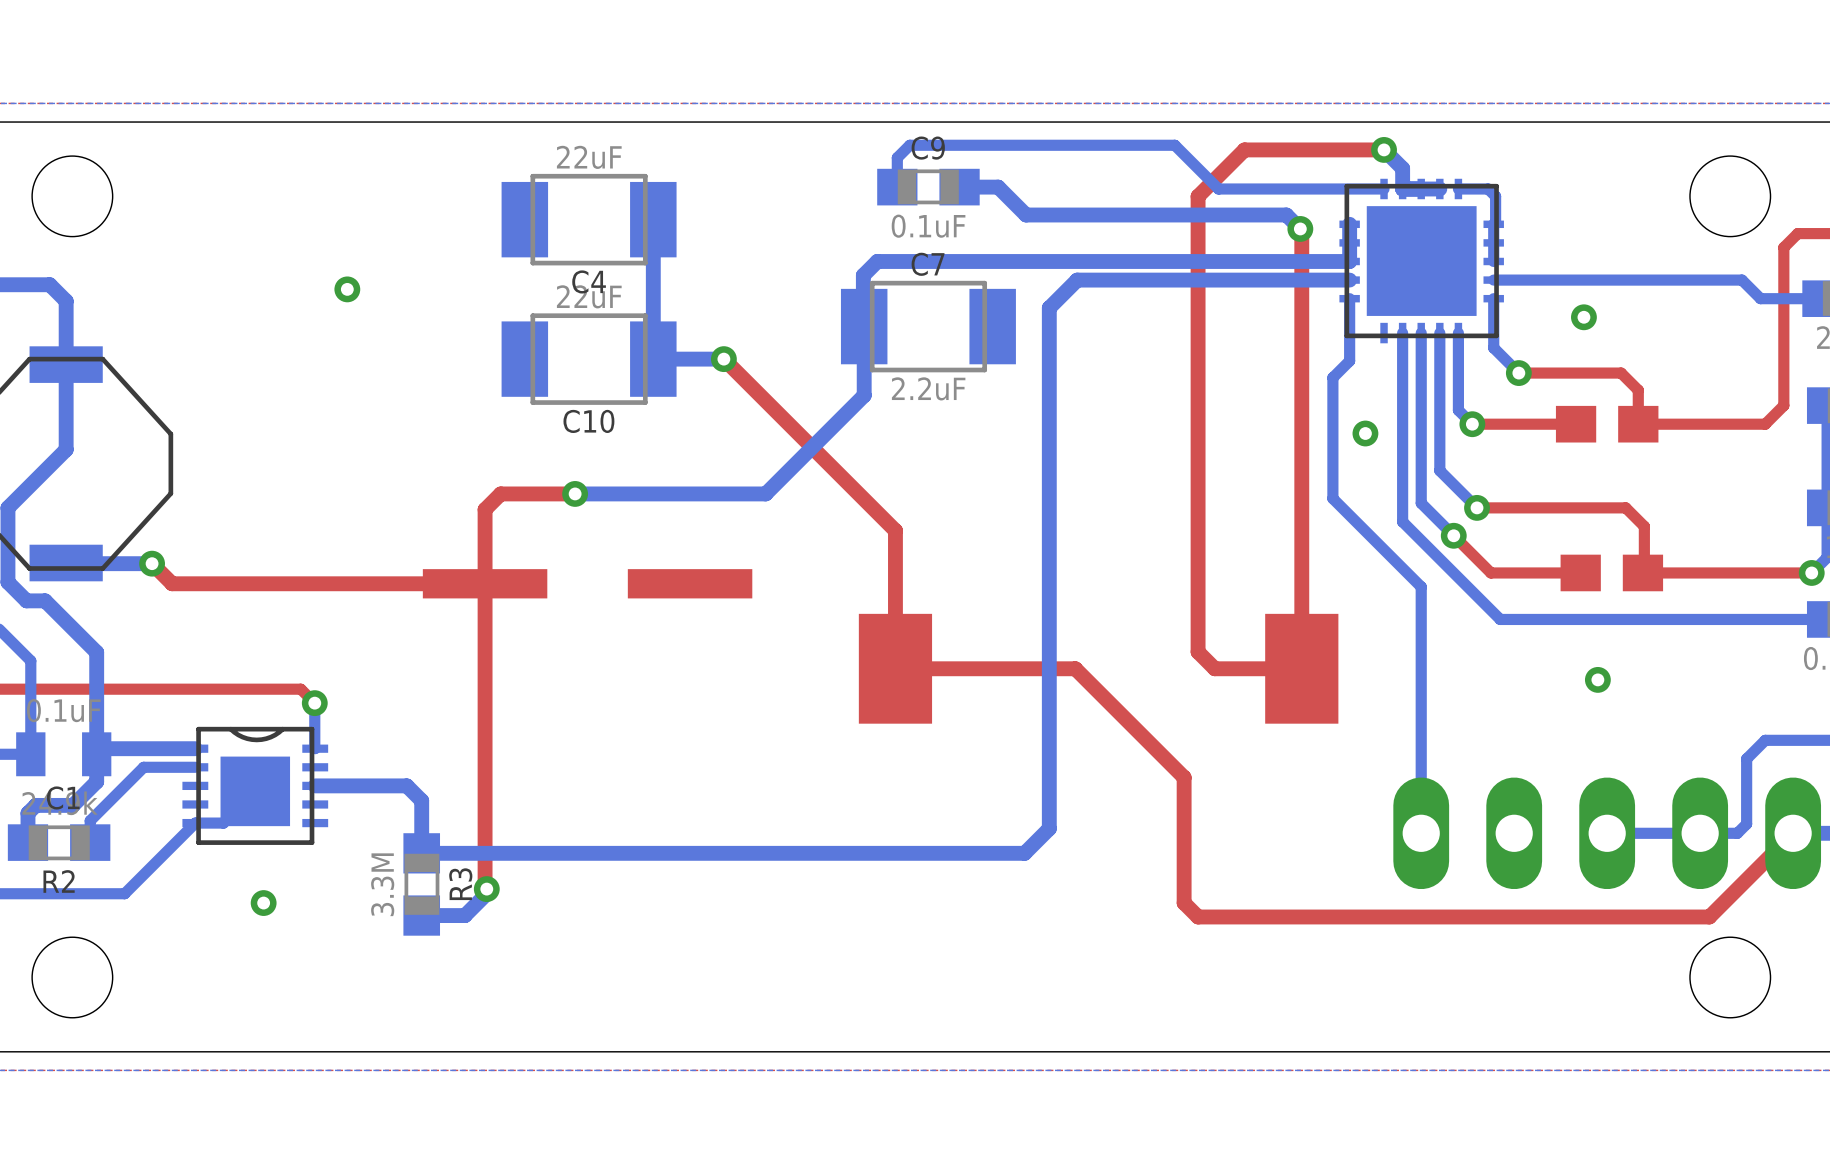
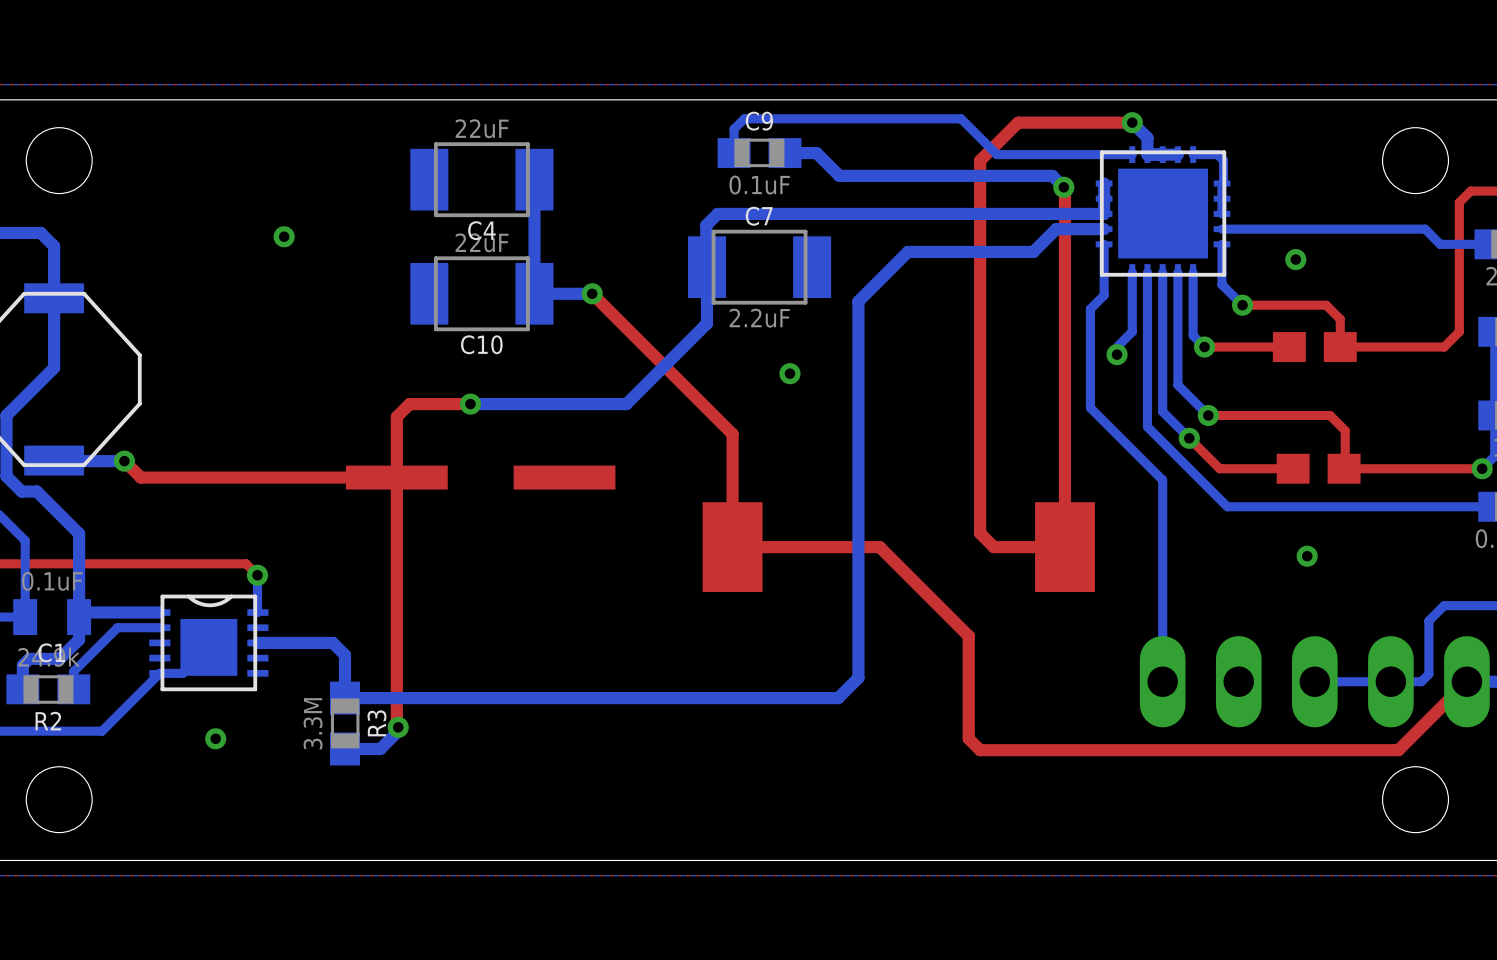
bottom track: (1291, 280) (1077, 280) (1049, 307) (1049, 368) -> (1056, 229) (1033, 251) (907, 251) (858, 301)
bottom track: none -> (1132, 272) (1132, 331) (1117, 347)
via: none -> (789, 373)

